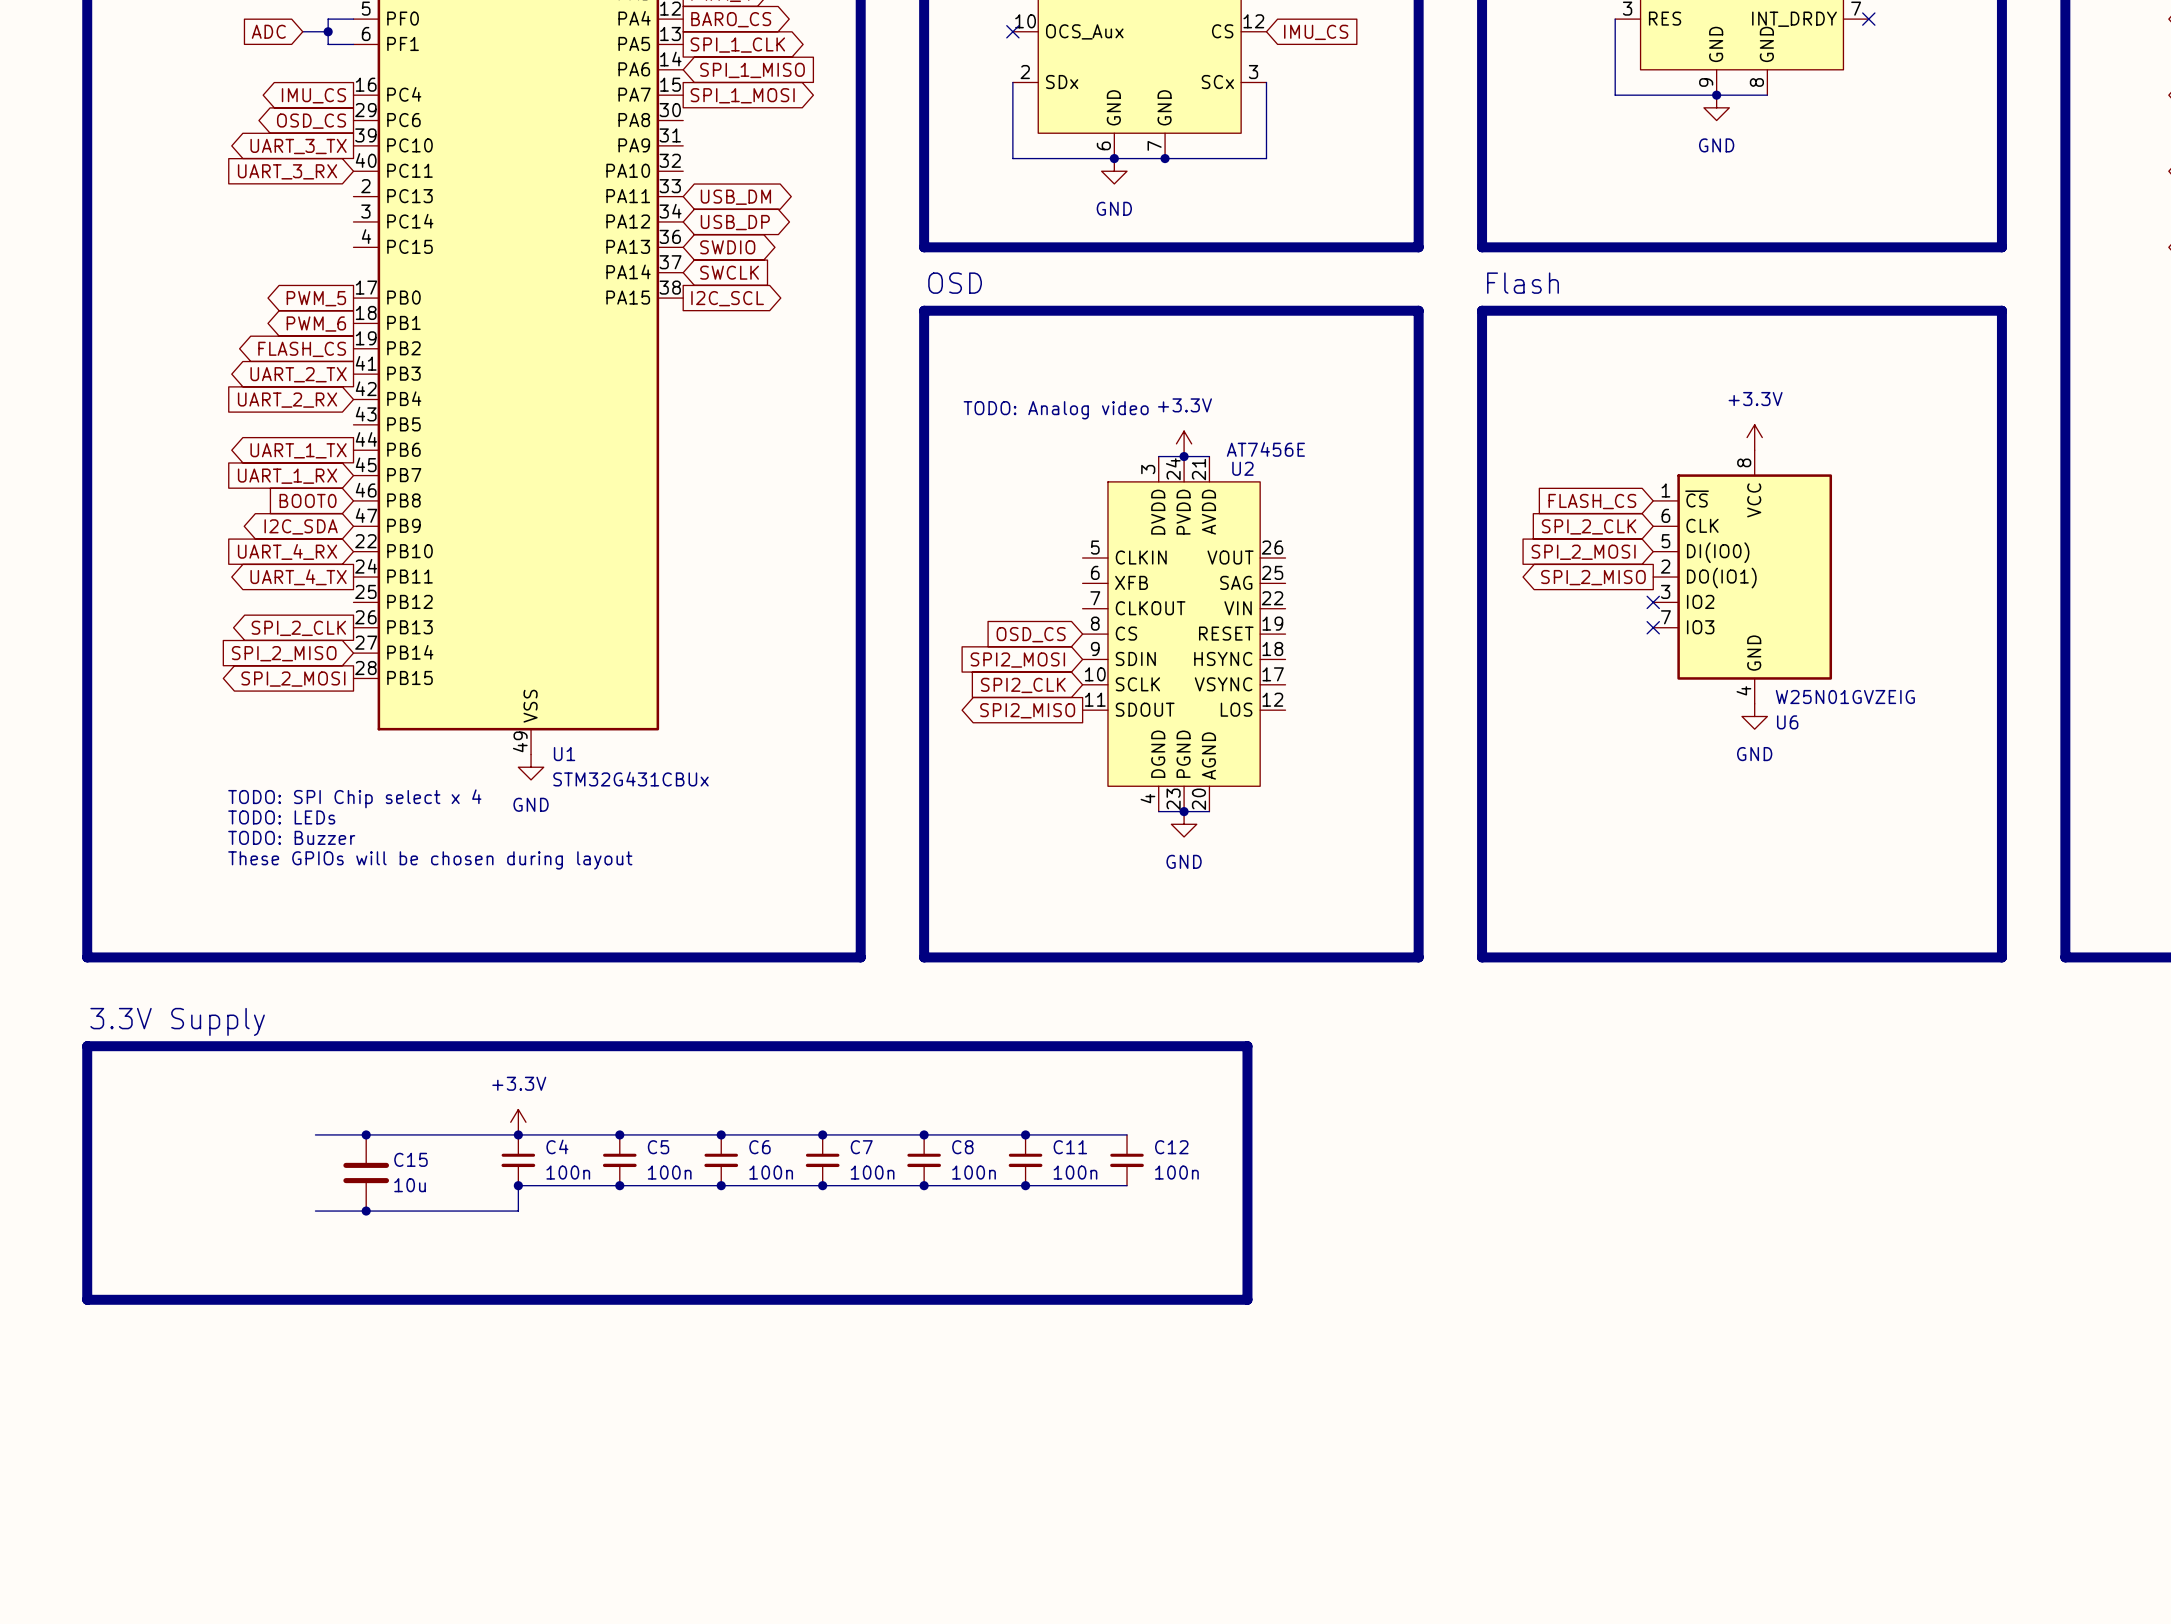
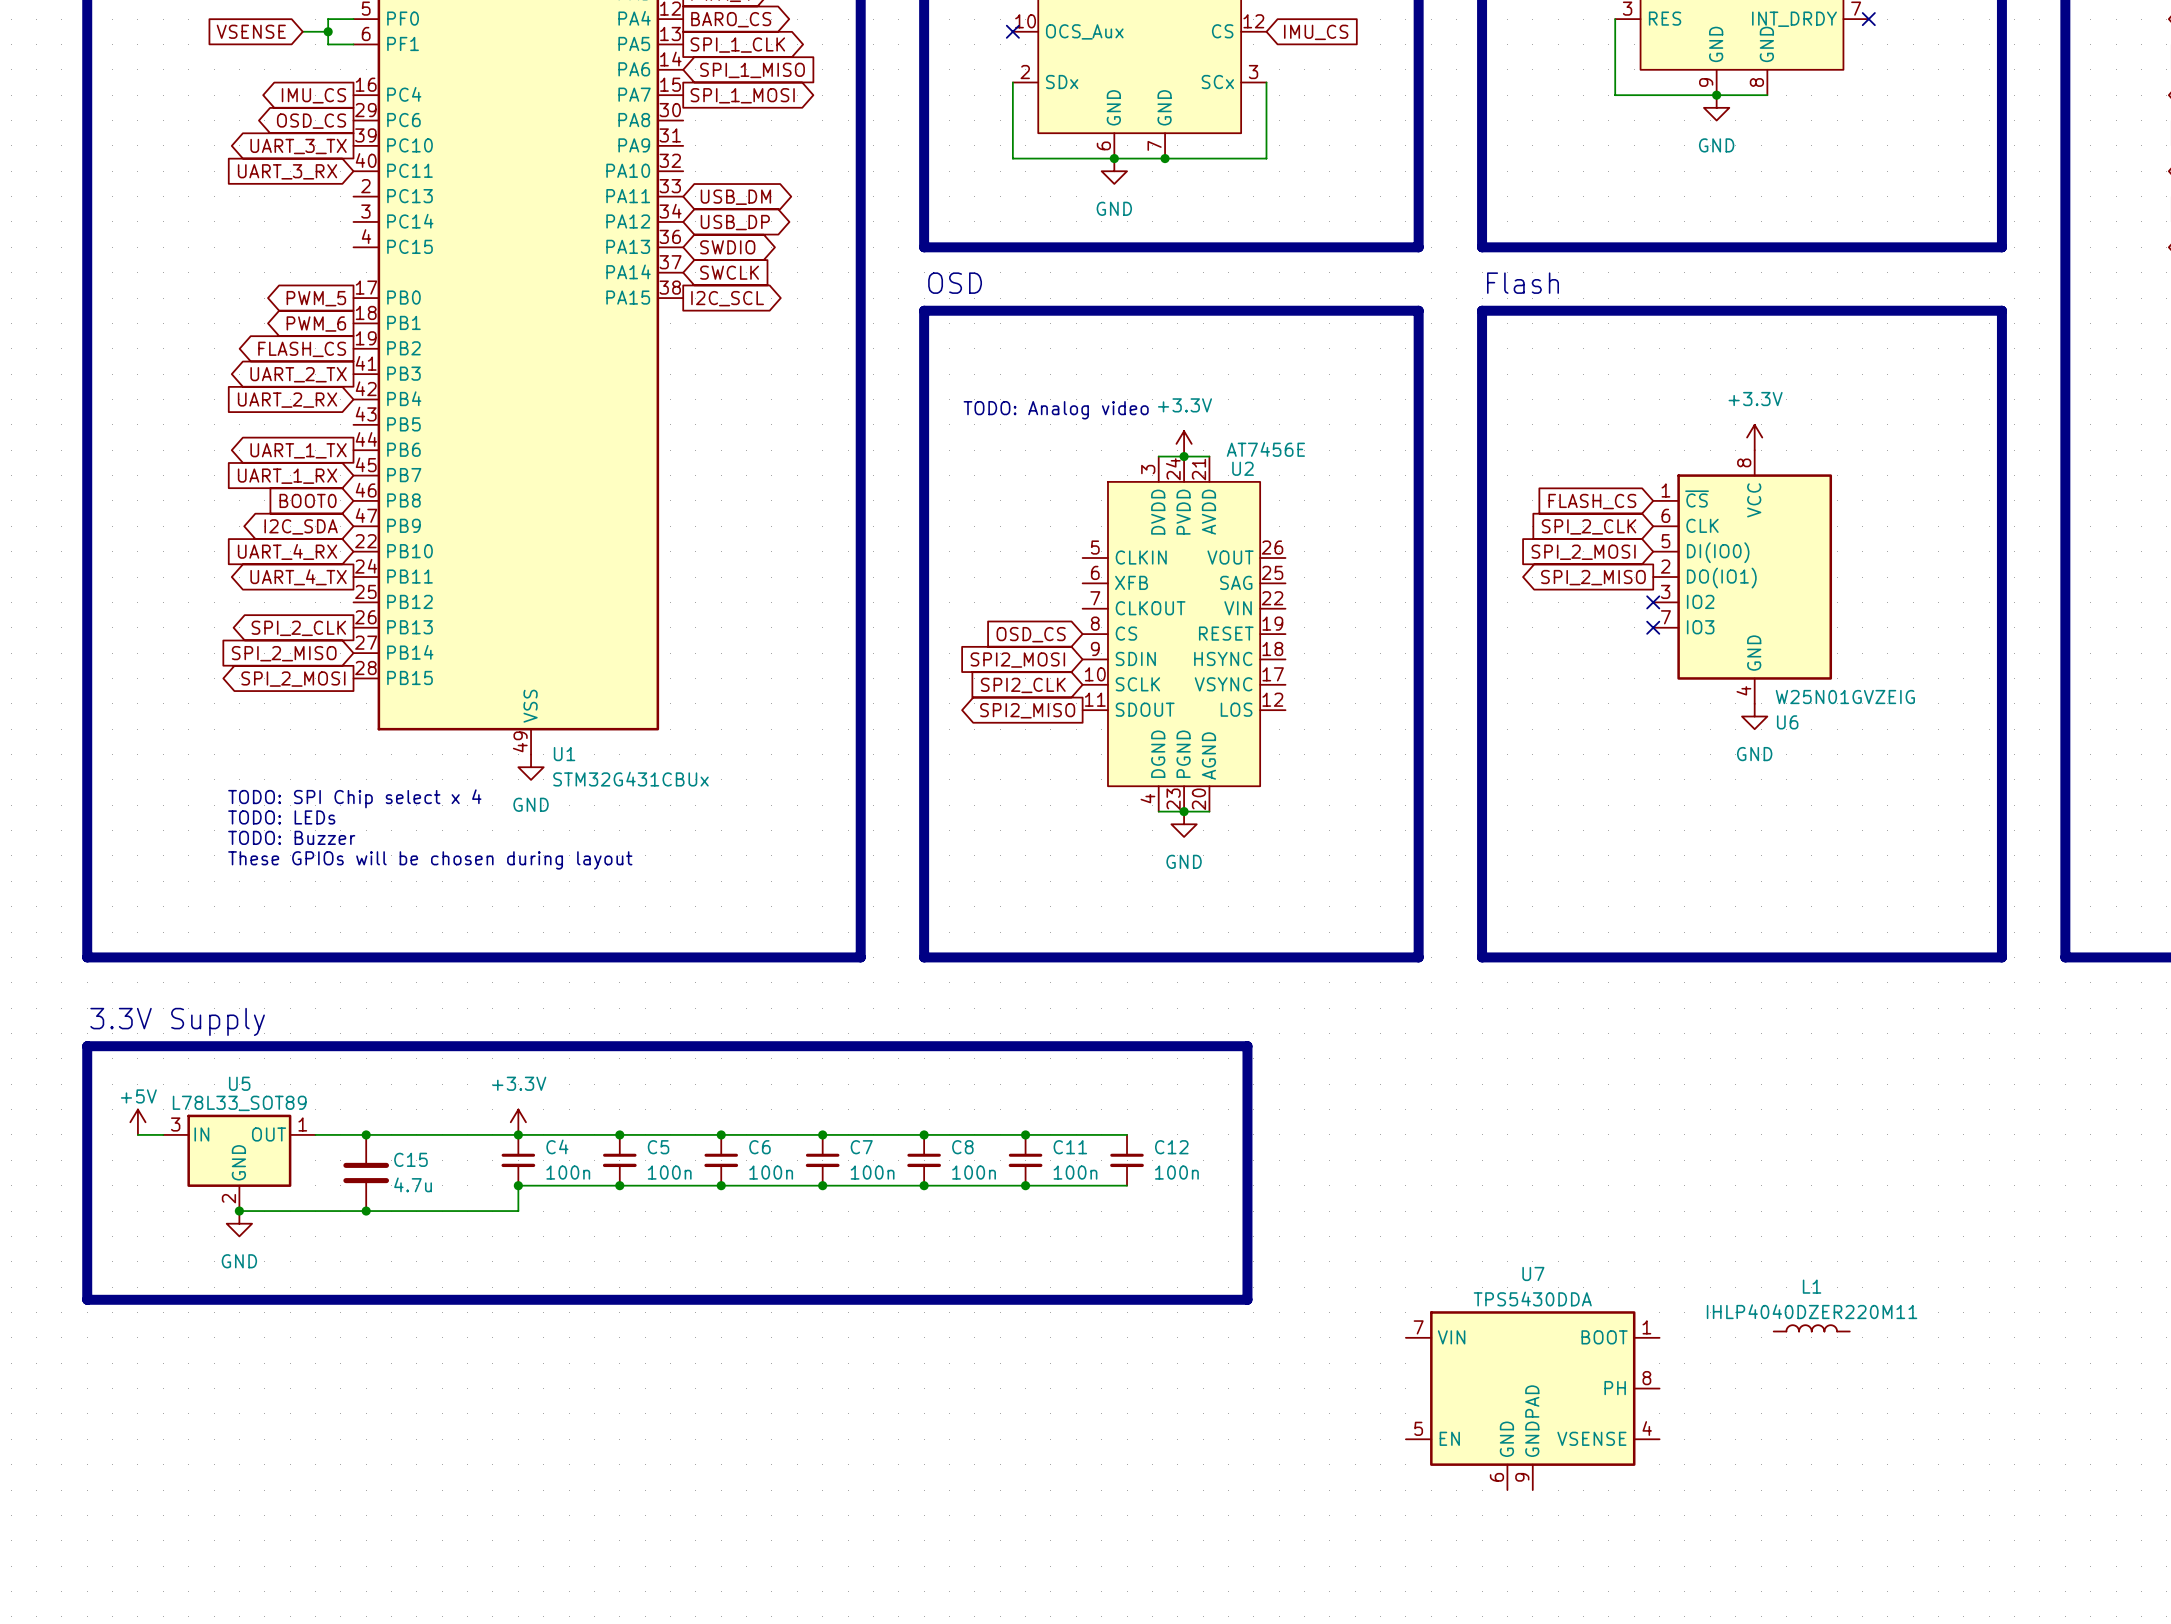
global label: ADC (268, 31) -> VSENSE (251, 31)
power symbol: none -> +5V (137, 1122)
wire: none -> (137, 1134) (163, 1134)
U5: none -> L78L33_SOT89 (239, 1162)
C15 value: 10u (410, 1185) -> 4.7u (413, 1184)
wire: none -> (239, 1211) (315, 1211)
junction: none -> (239, 1211)
power symbol: none -> GND (239, 1223)
L1: none -> IHLP4040DZER220M11 (1811, 1328)
U7: none -> TPS5430DDA (1532, 1400)

